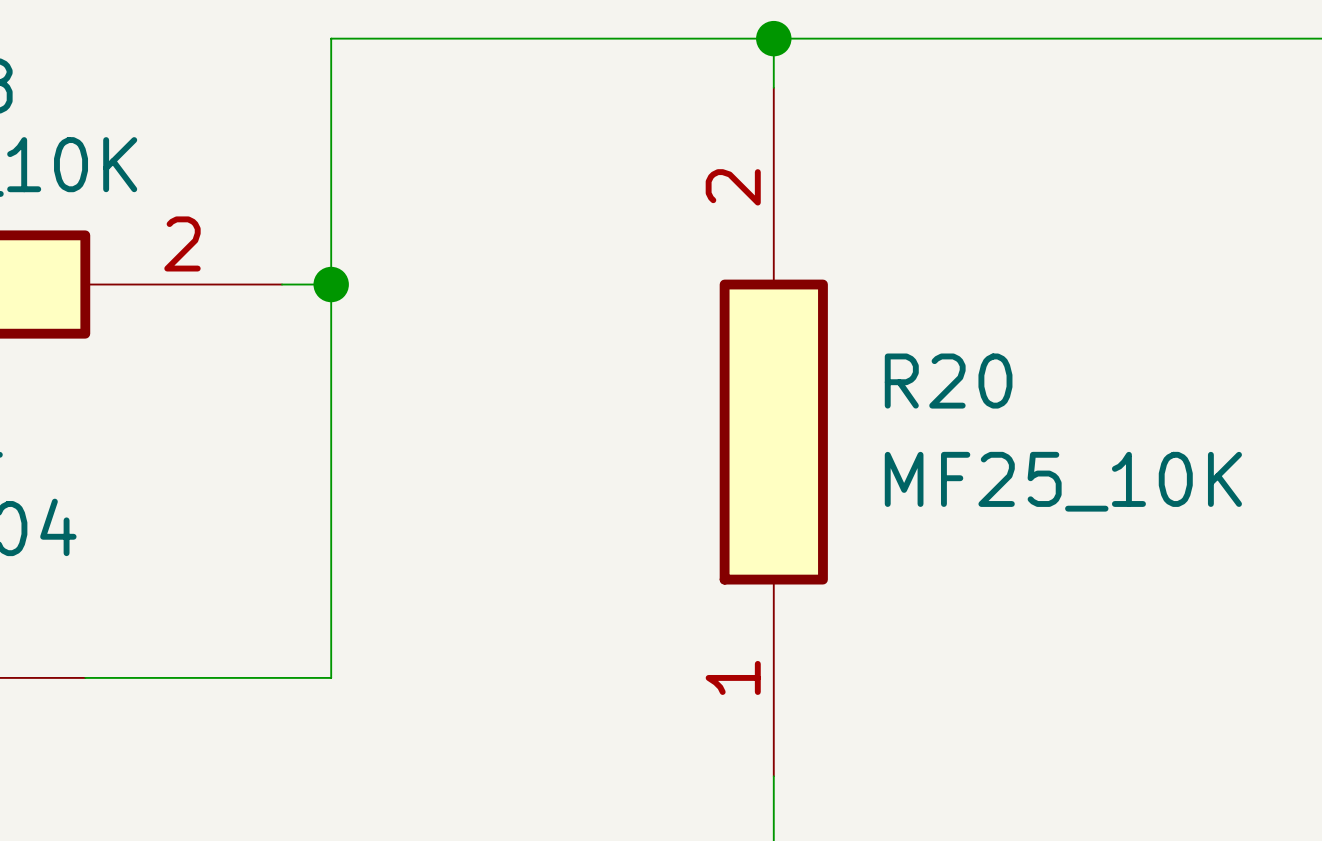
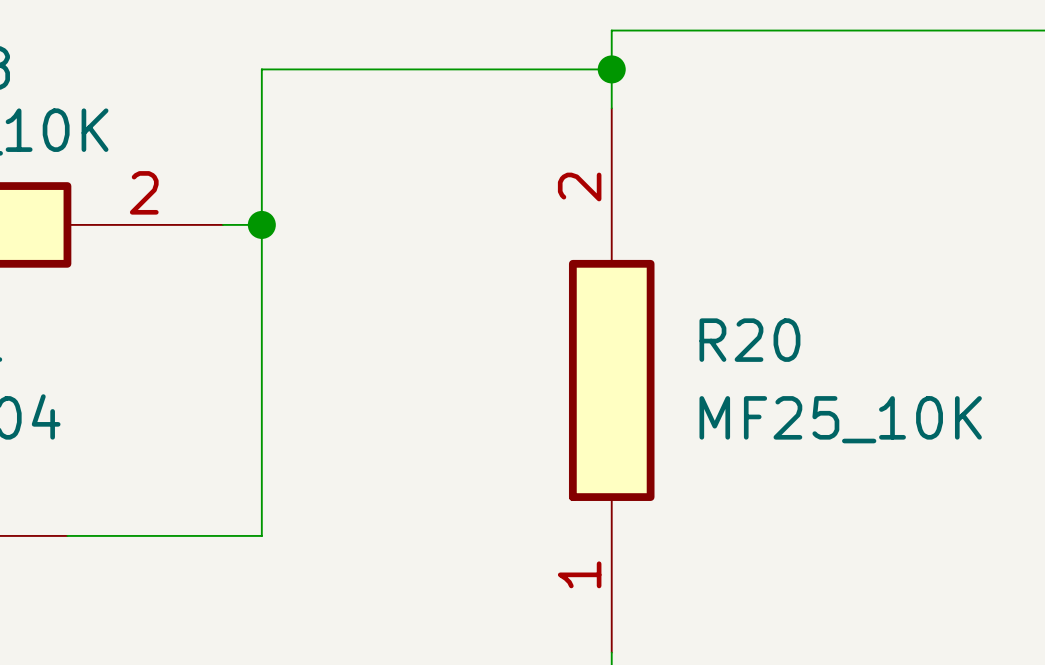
wire: (773, 38) (331, 38) (331, 87) -> (611, 108) (611, 69) (261, 69)
junction position: (773, 38) -> (611, 69)
R20 position: (773, 432) -> (611, 380)

